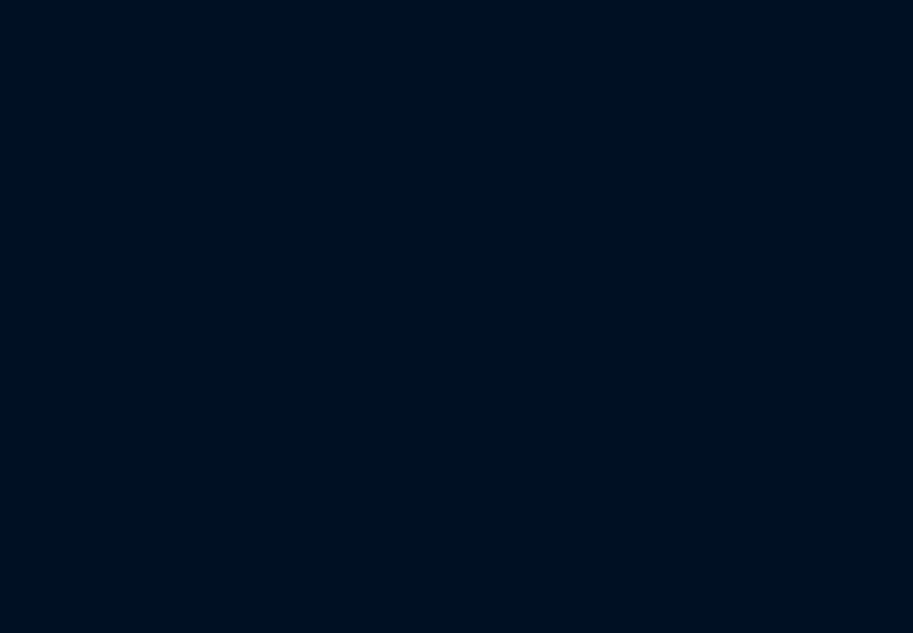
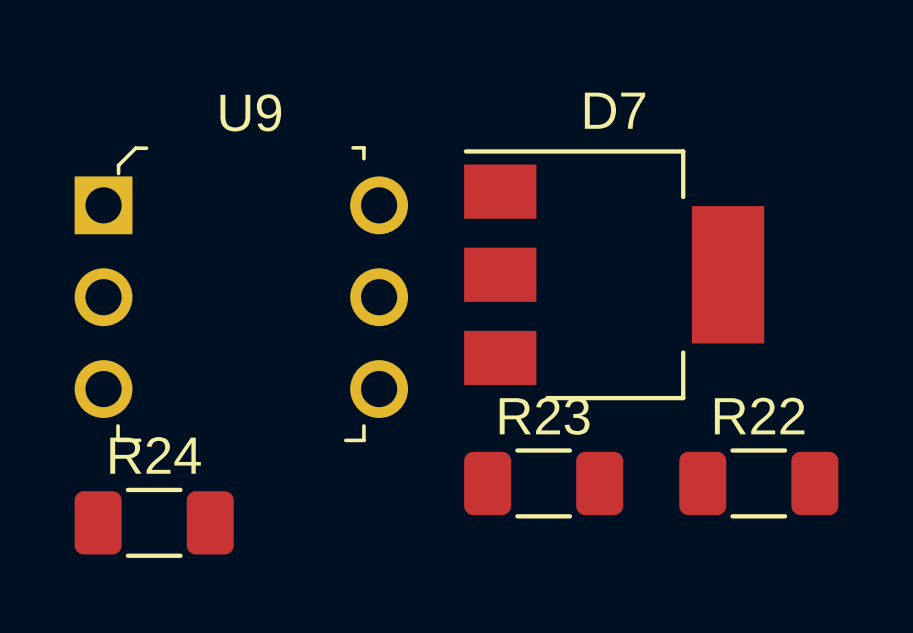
D7: none -> (613, 274)
U9: none -> (241, 294)
R23: none -> (543, 483)
R22: none -> (758, 483)
R24: none -> (154, 522)

